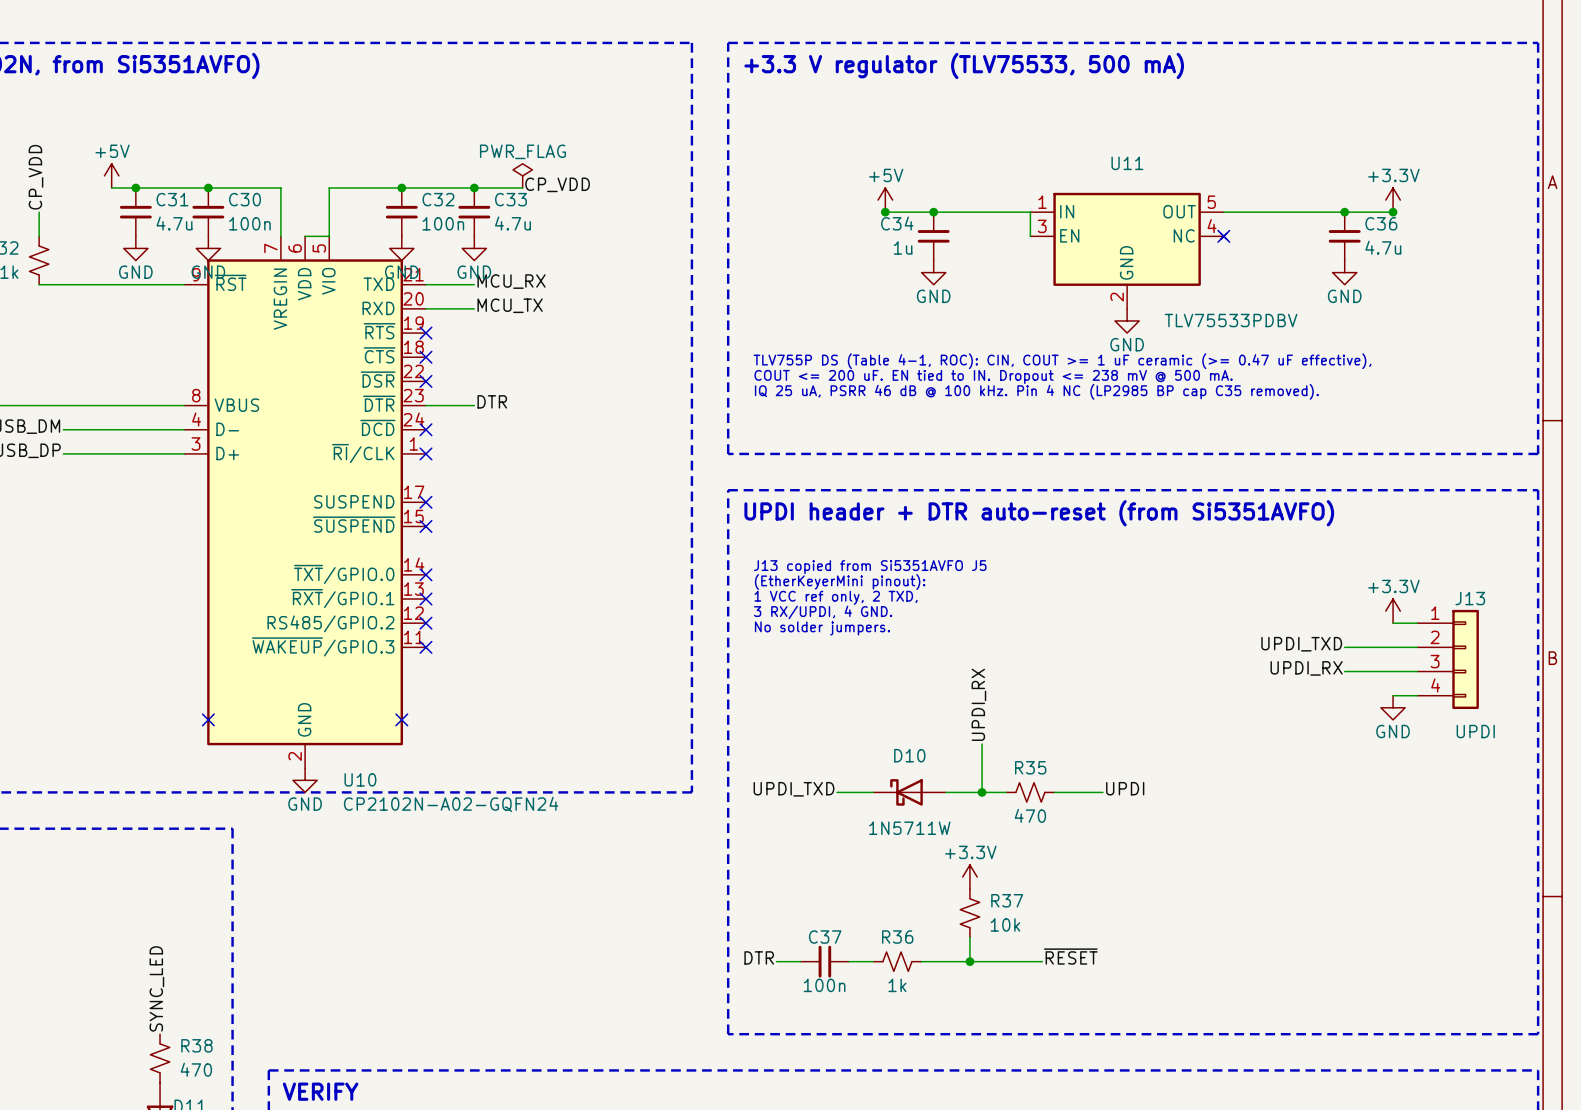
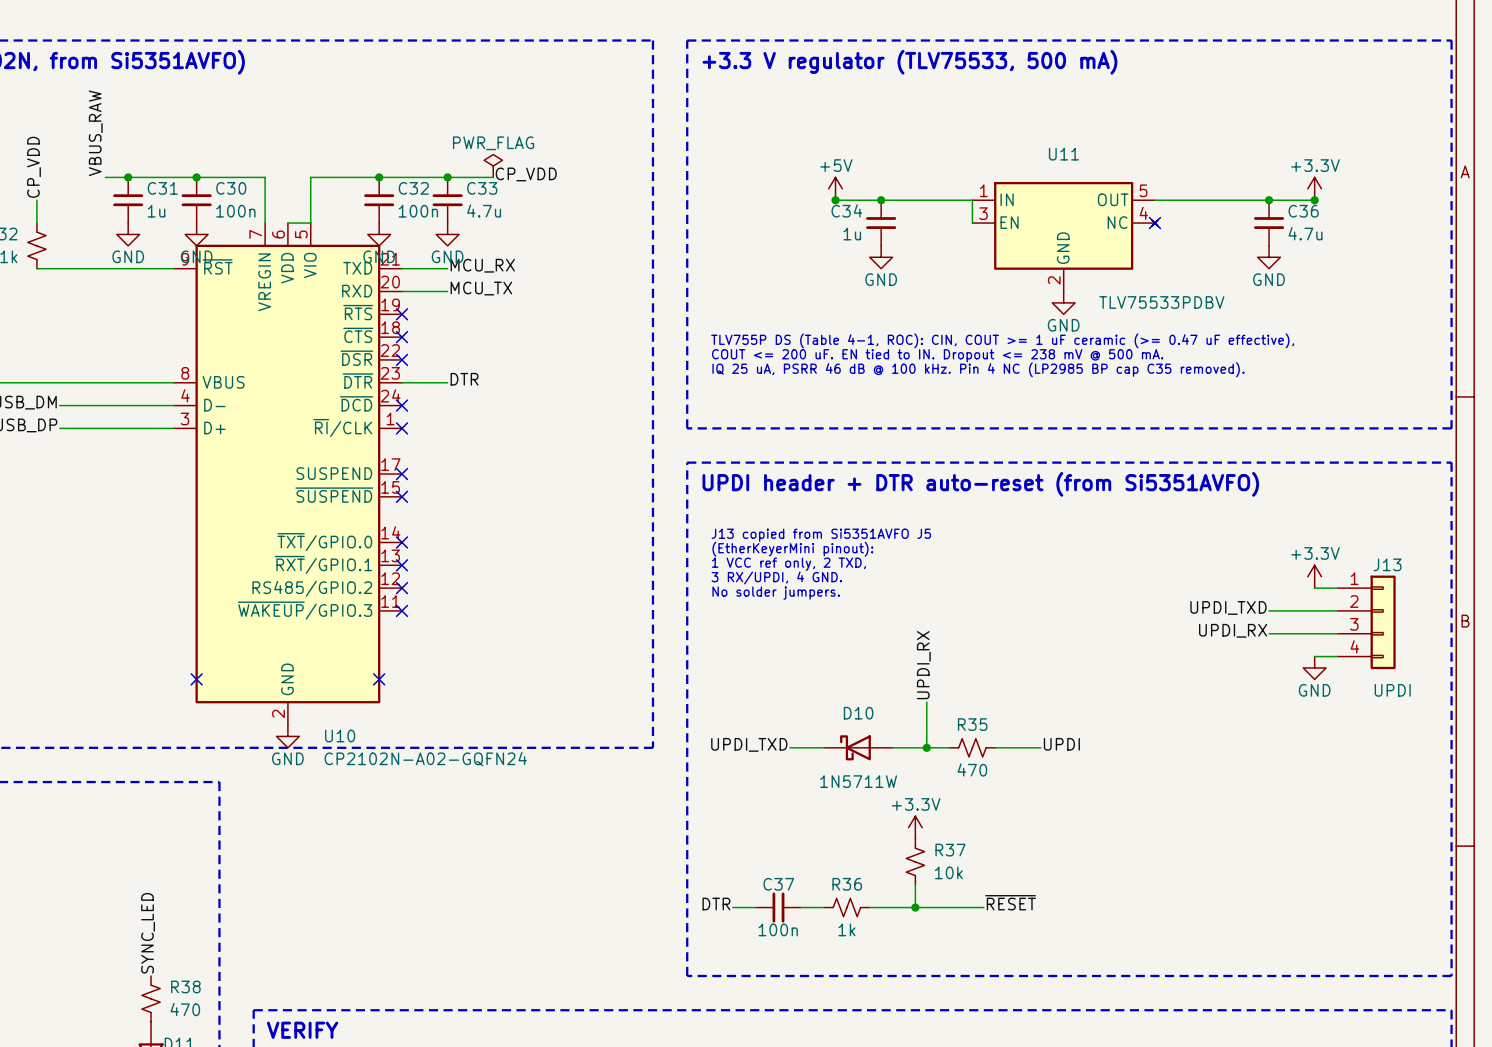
label: none -> VBUS_RAW (95, 133)
power symbol: +5V (111, 175) -> none
C31 value: 4.7u (174, 223) -> 1u (156, 211)

